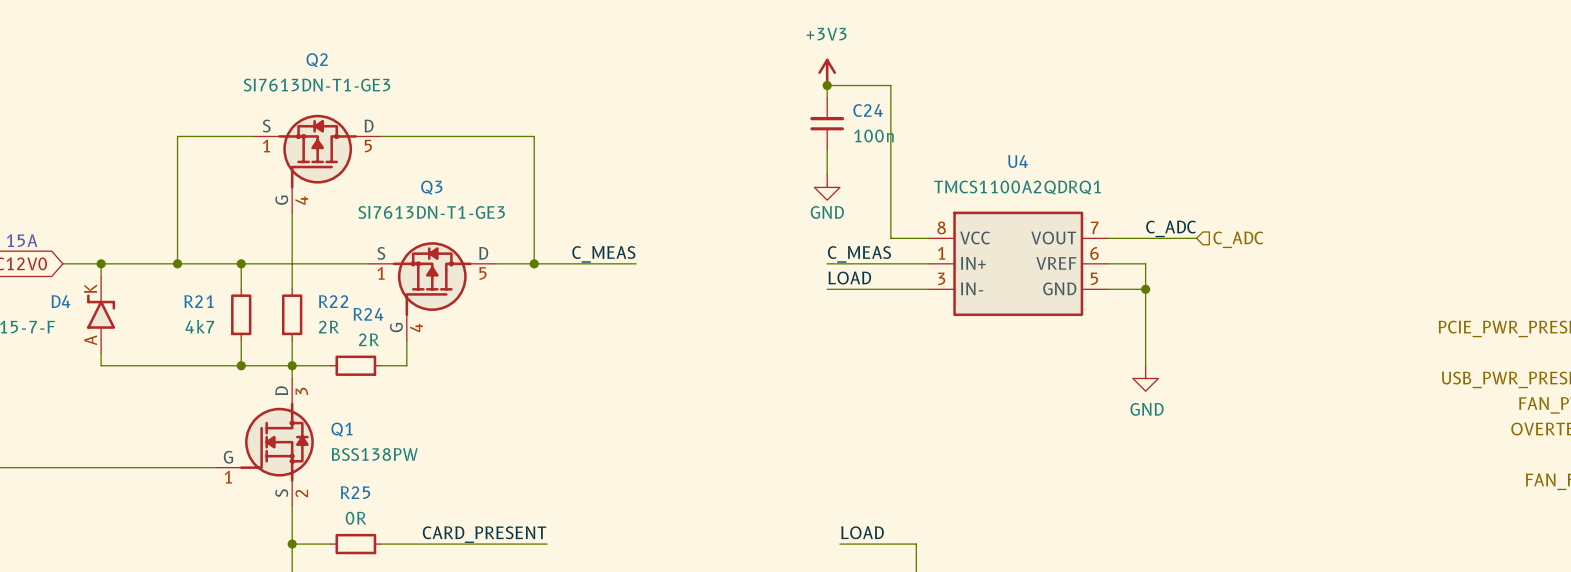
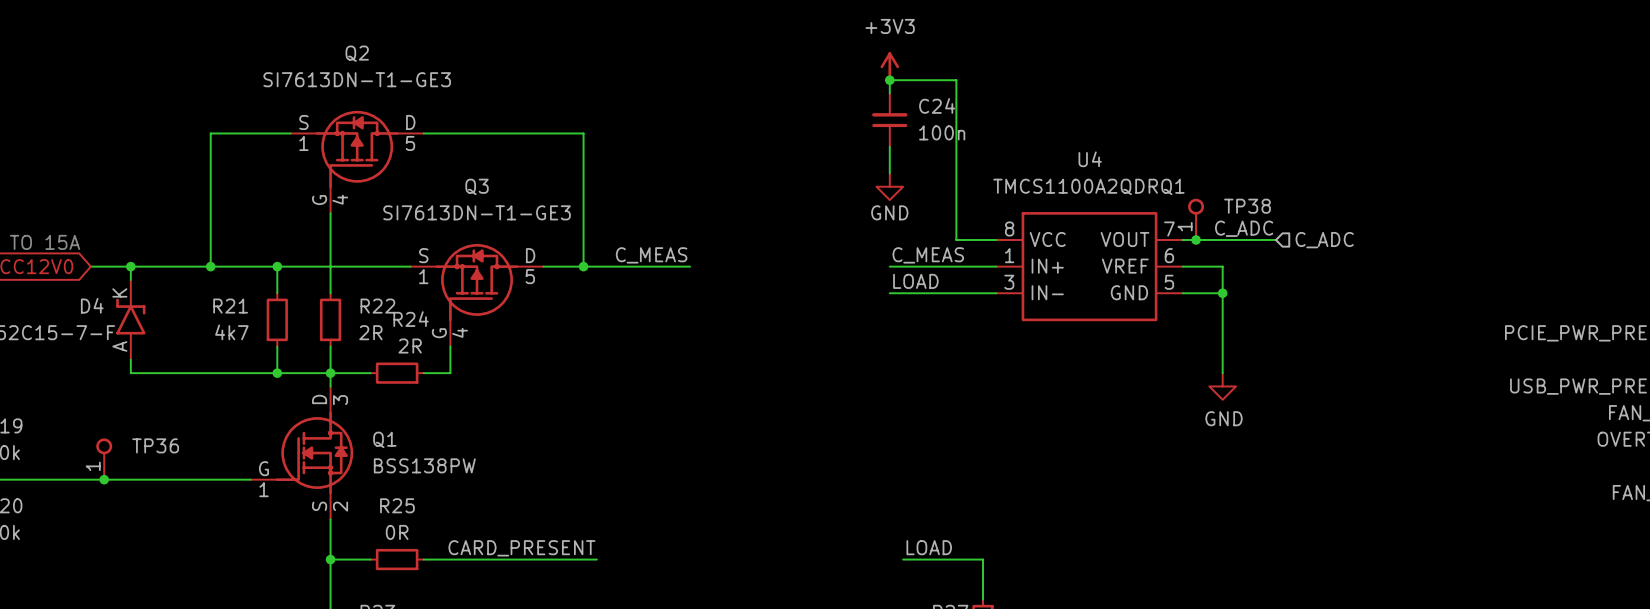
TP38: none -> (1196, 219)
junction: none -> (1196, 239)
TP36: none -> (104, 459)
junction: none -> (104, 479)

